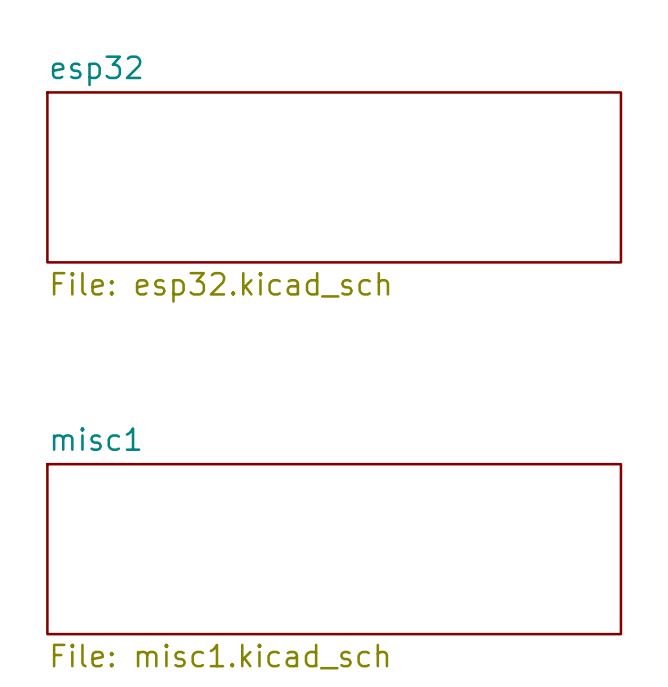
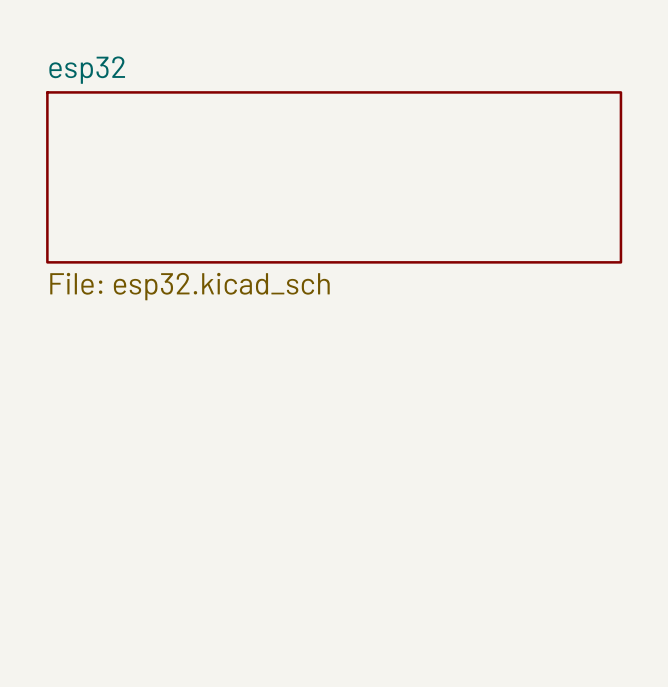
sheet misc1: File: misc1.kicad_sch (334, 549) -> none

